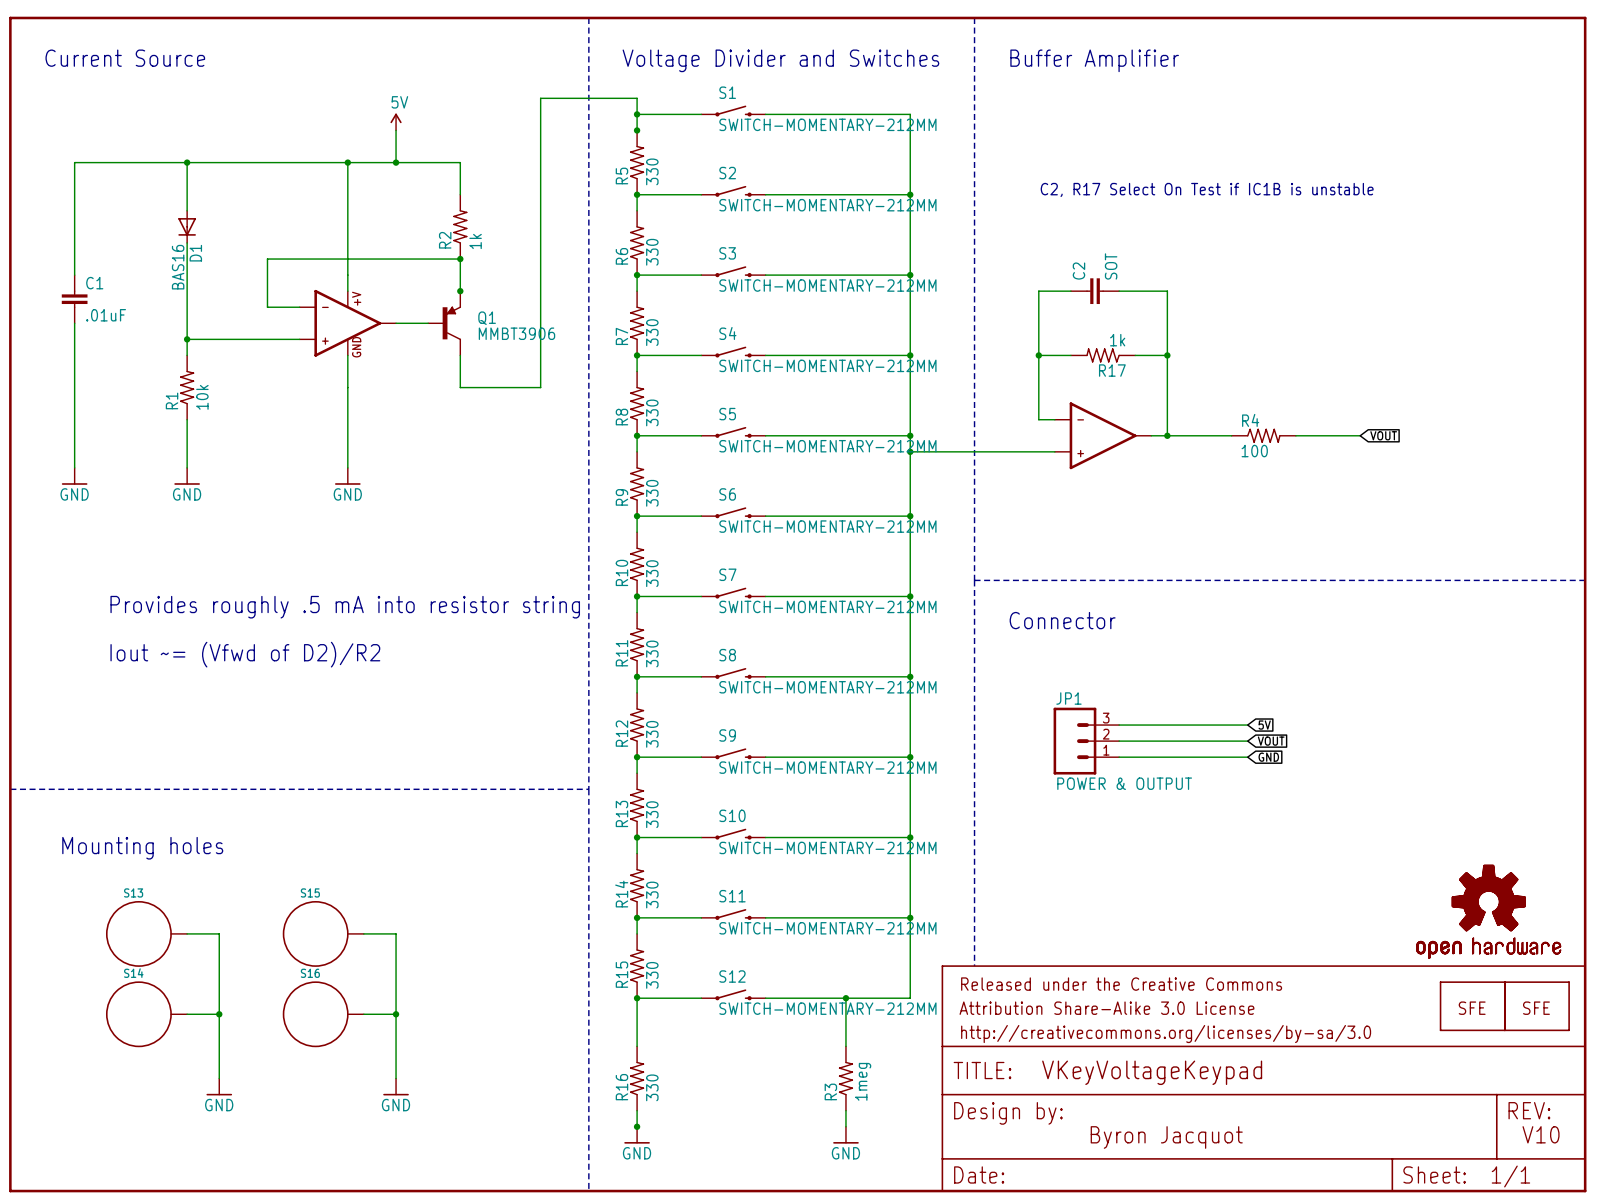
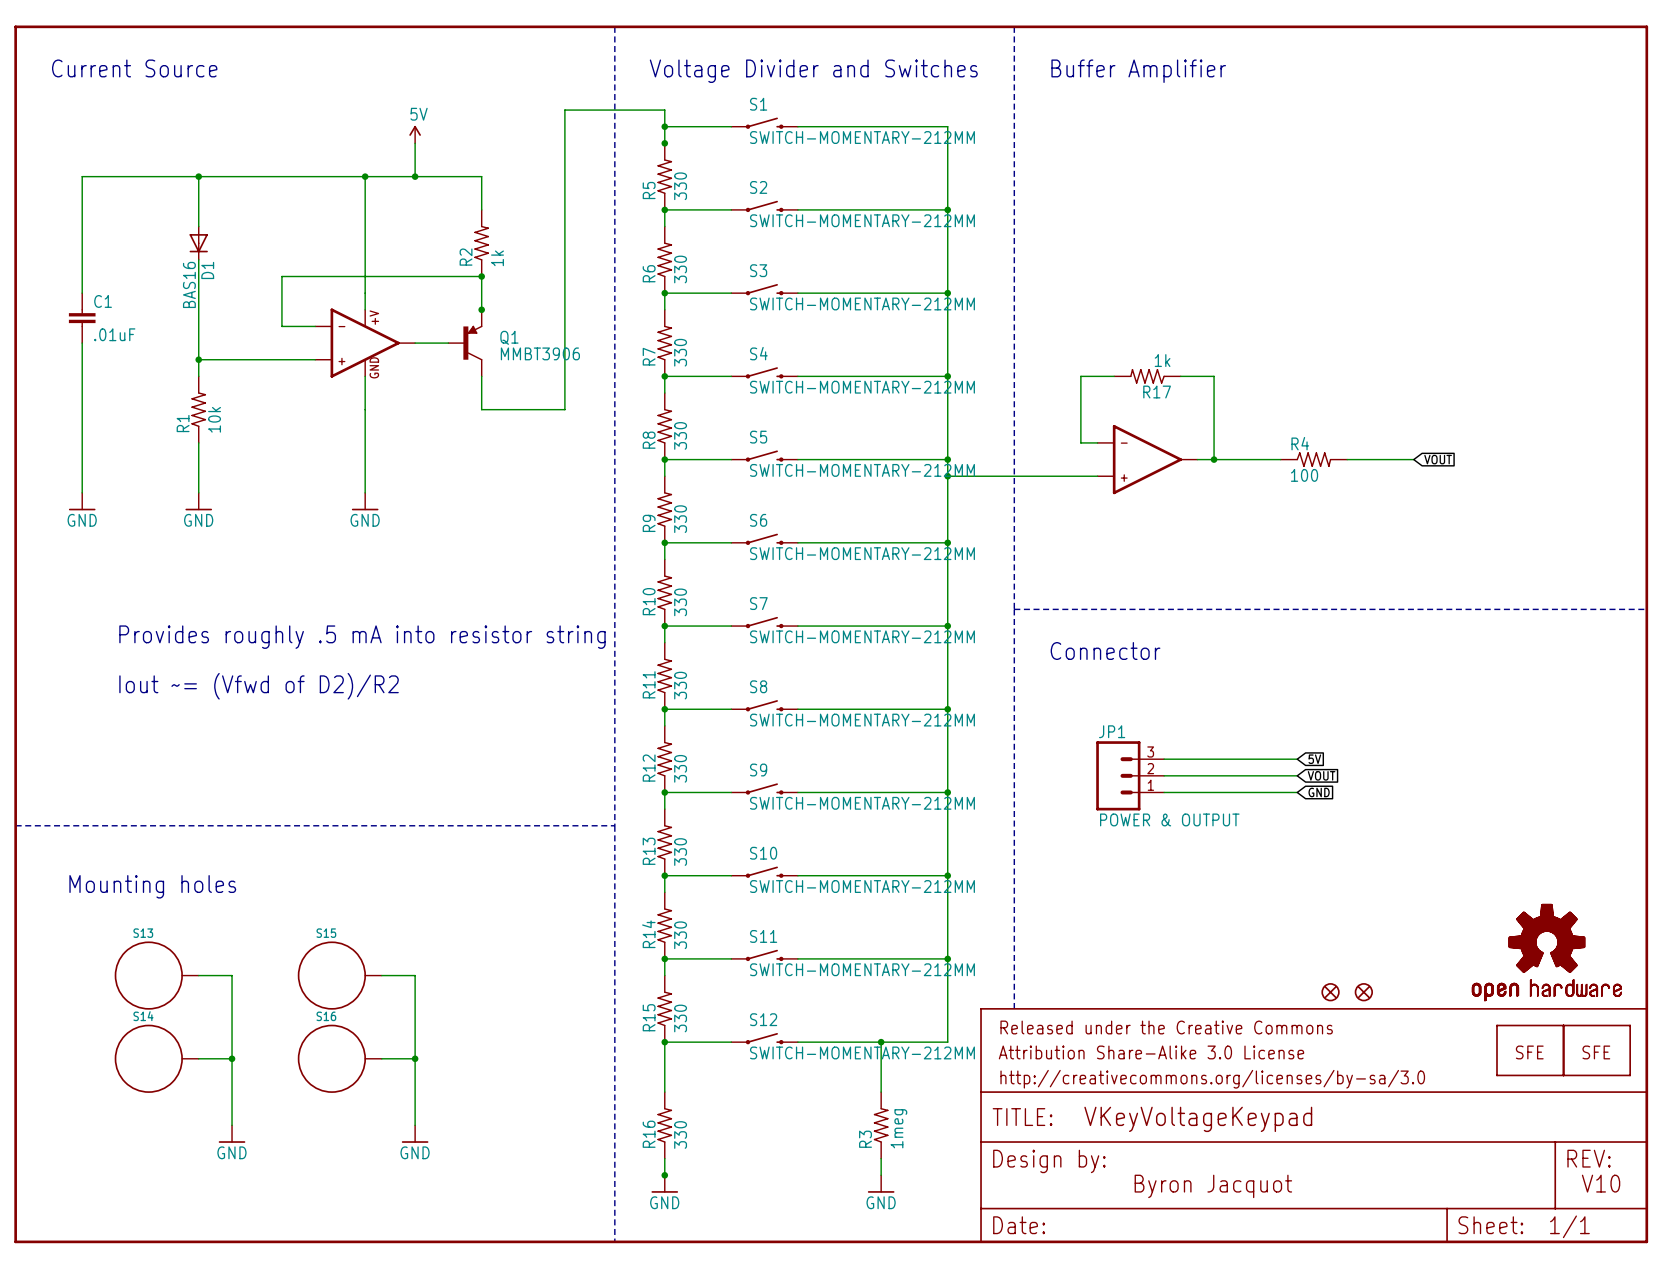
text: C2, R17 Select On Test if IC1B is unstable (1207, 189) -> none
wire: (1070, 291) (1038, 291) (1038, 355) -> none
C2: SOT (1095, 291) -> none
wire: (1119, 291) (1167, 291) (1167, 355) -> none
junction: (1038, 355) -> none
junction: (1167, 355) -> none
part: none -> (1330, 992)
part: none -> (1363, 992)

